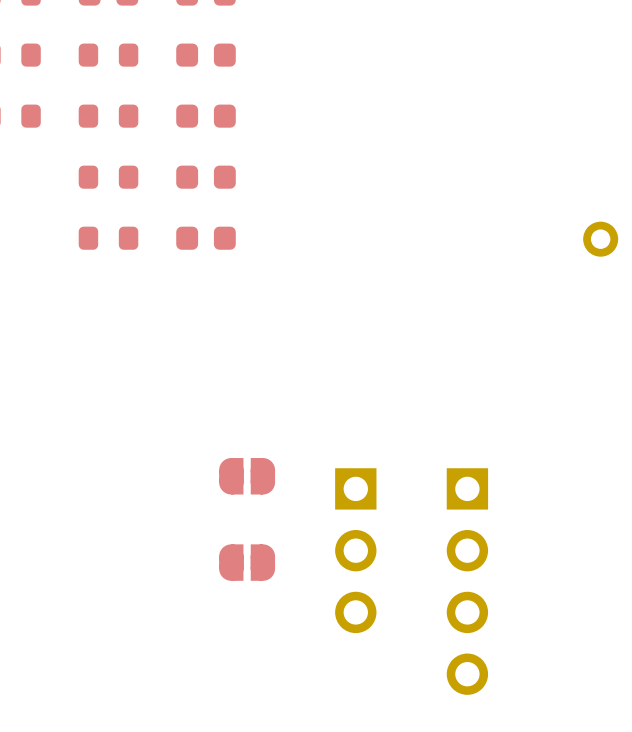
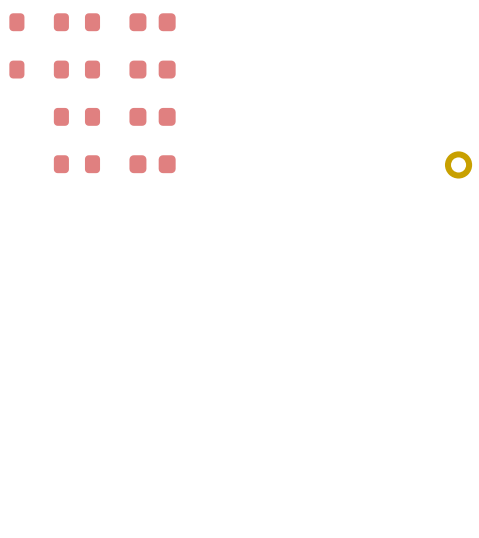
part: (247, 476) -> none
part: (355, 550) -> none
part: (247, 562) -> none
part: (467, 581) -> none

